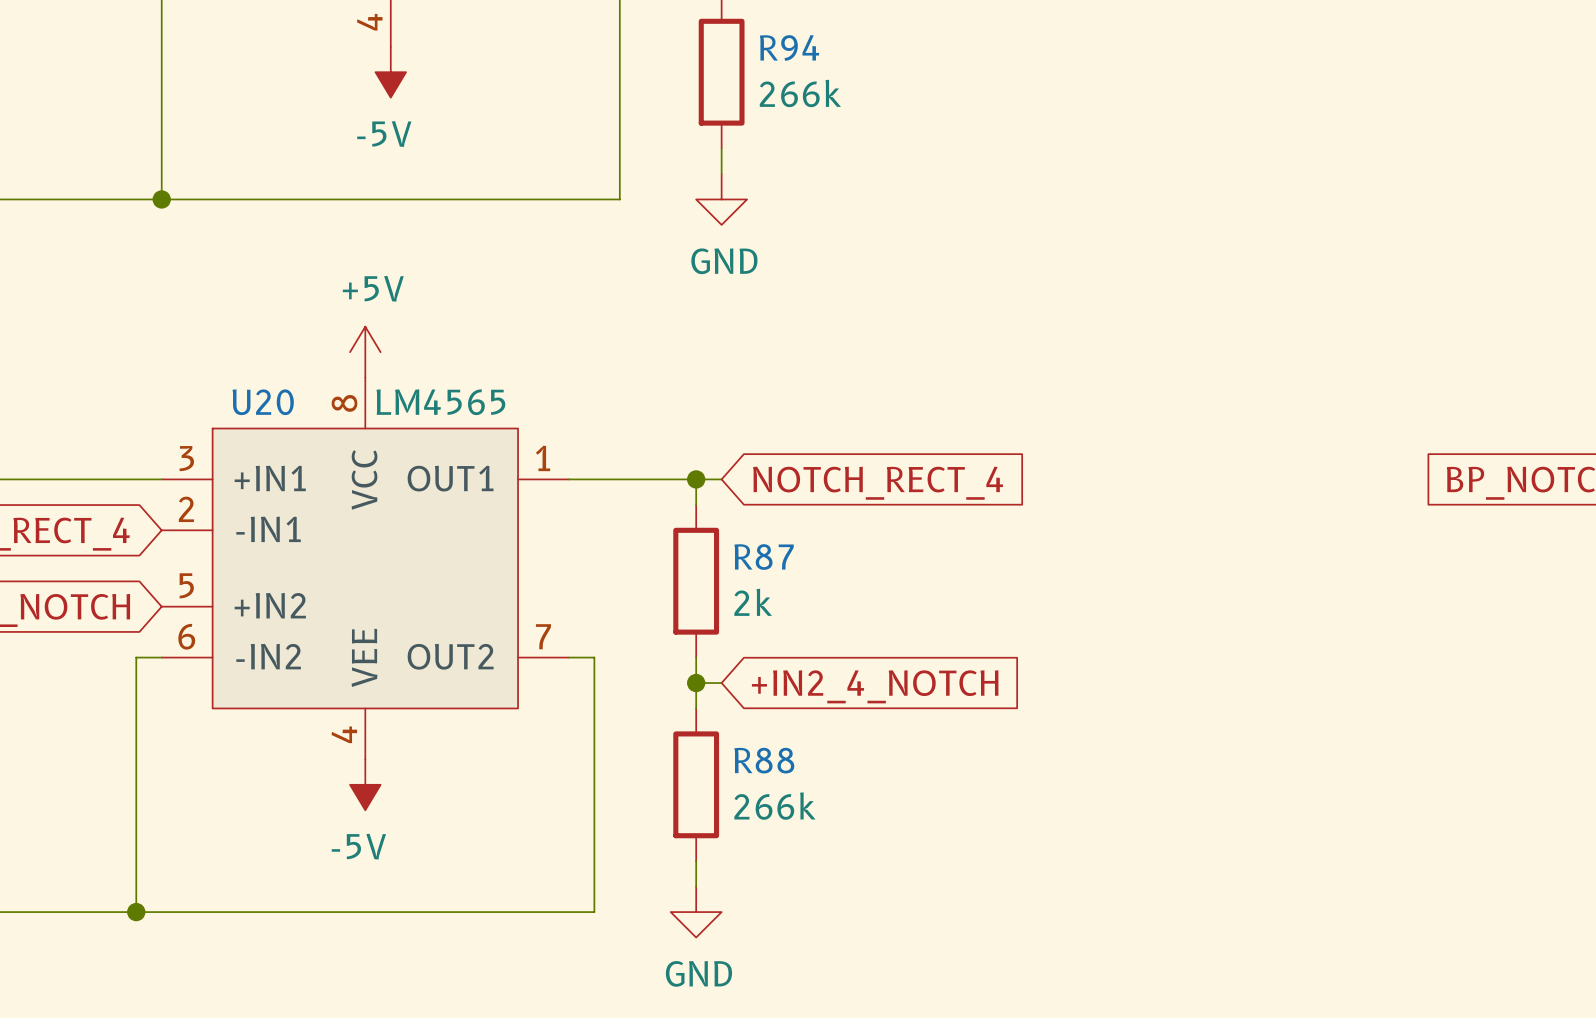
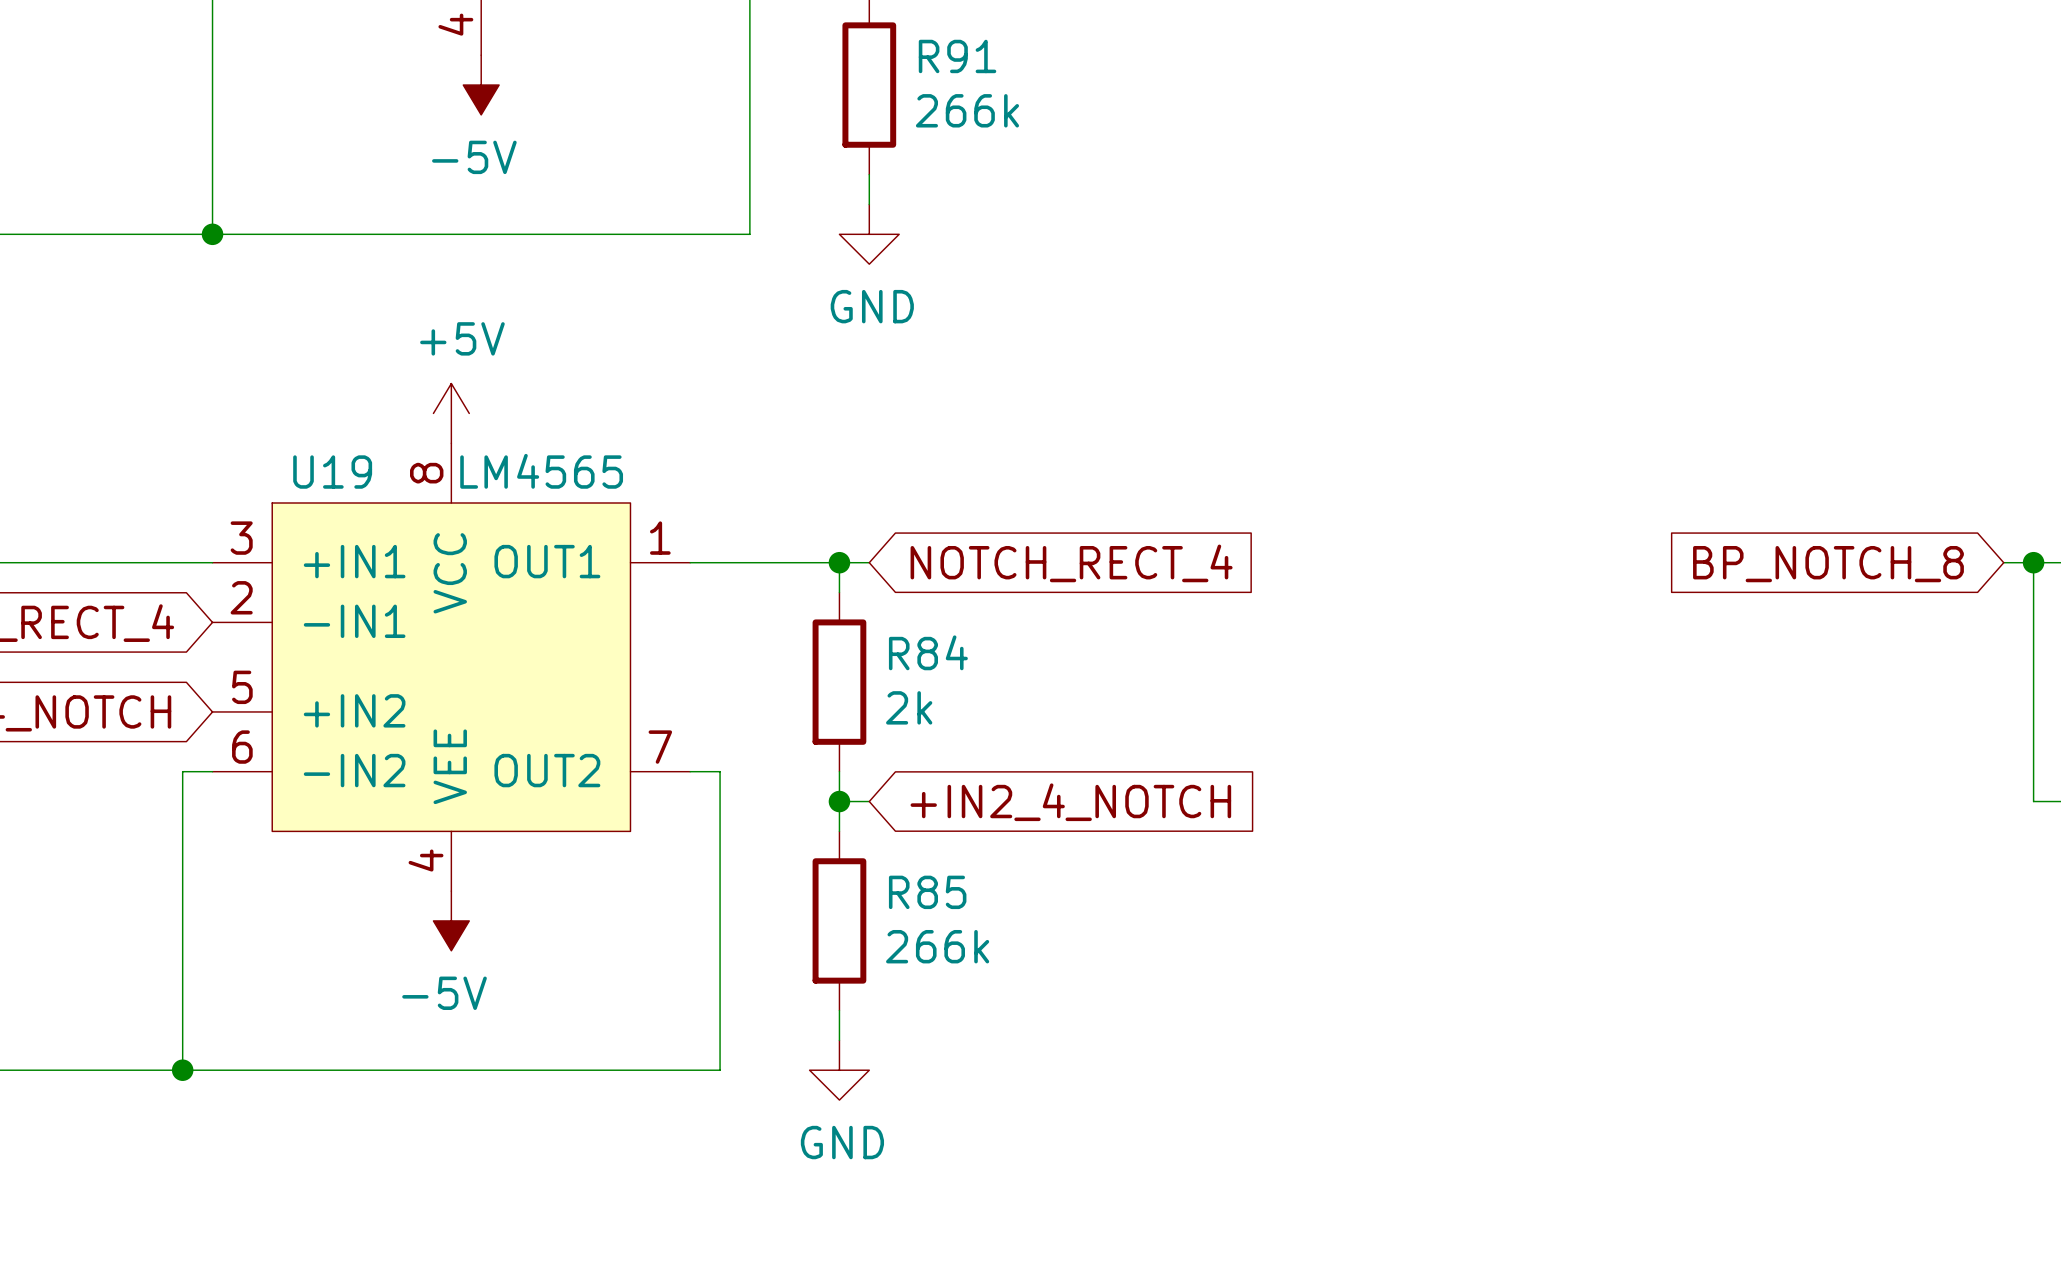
R94 name: R94 (789, 47) -> R91 (957, 56)
U20 name: U20 (263, 402) -> U19 (332, 472)
R87 name: R87 (764, 557) -> R84 (928, 652)
R88 name: R88 (764, 760) -> R85 (927, 892)

